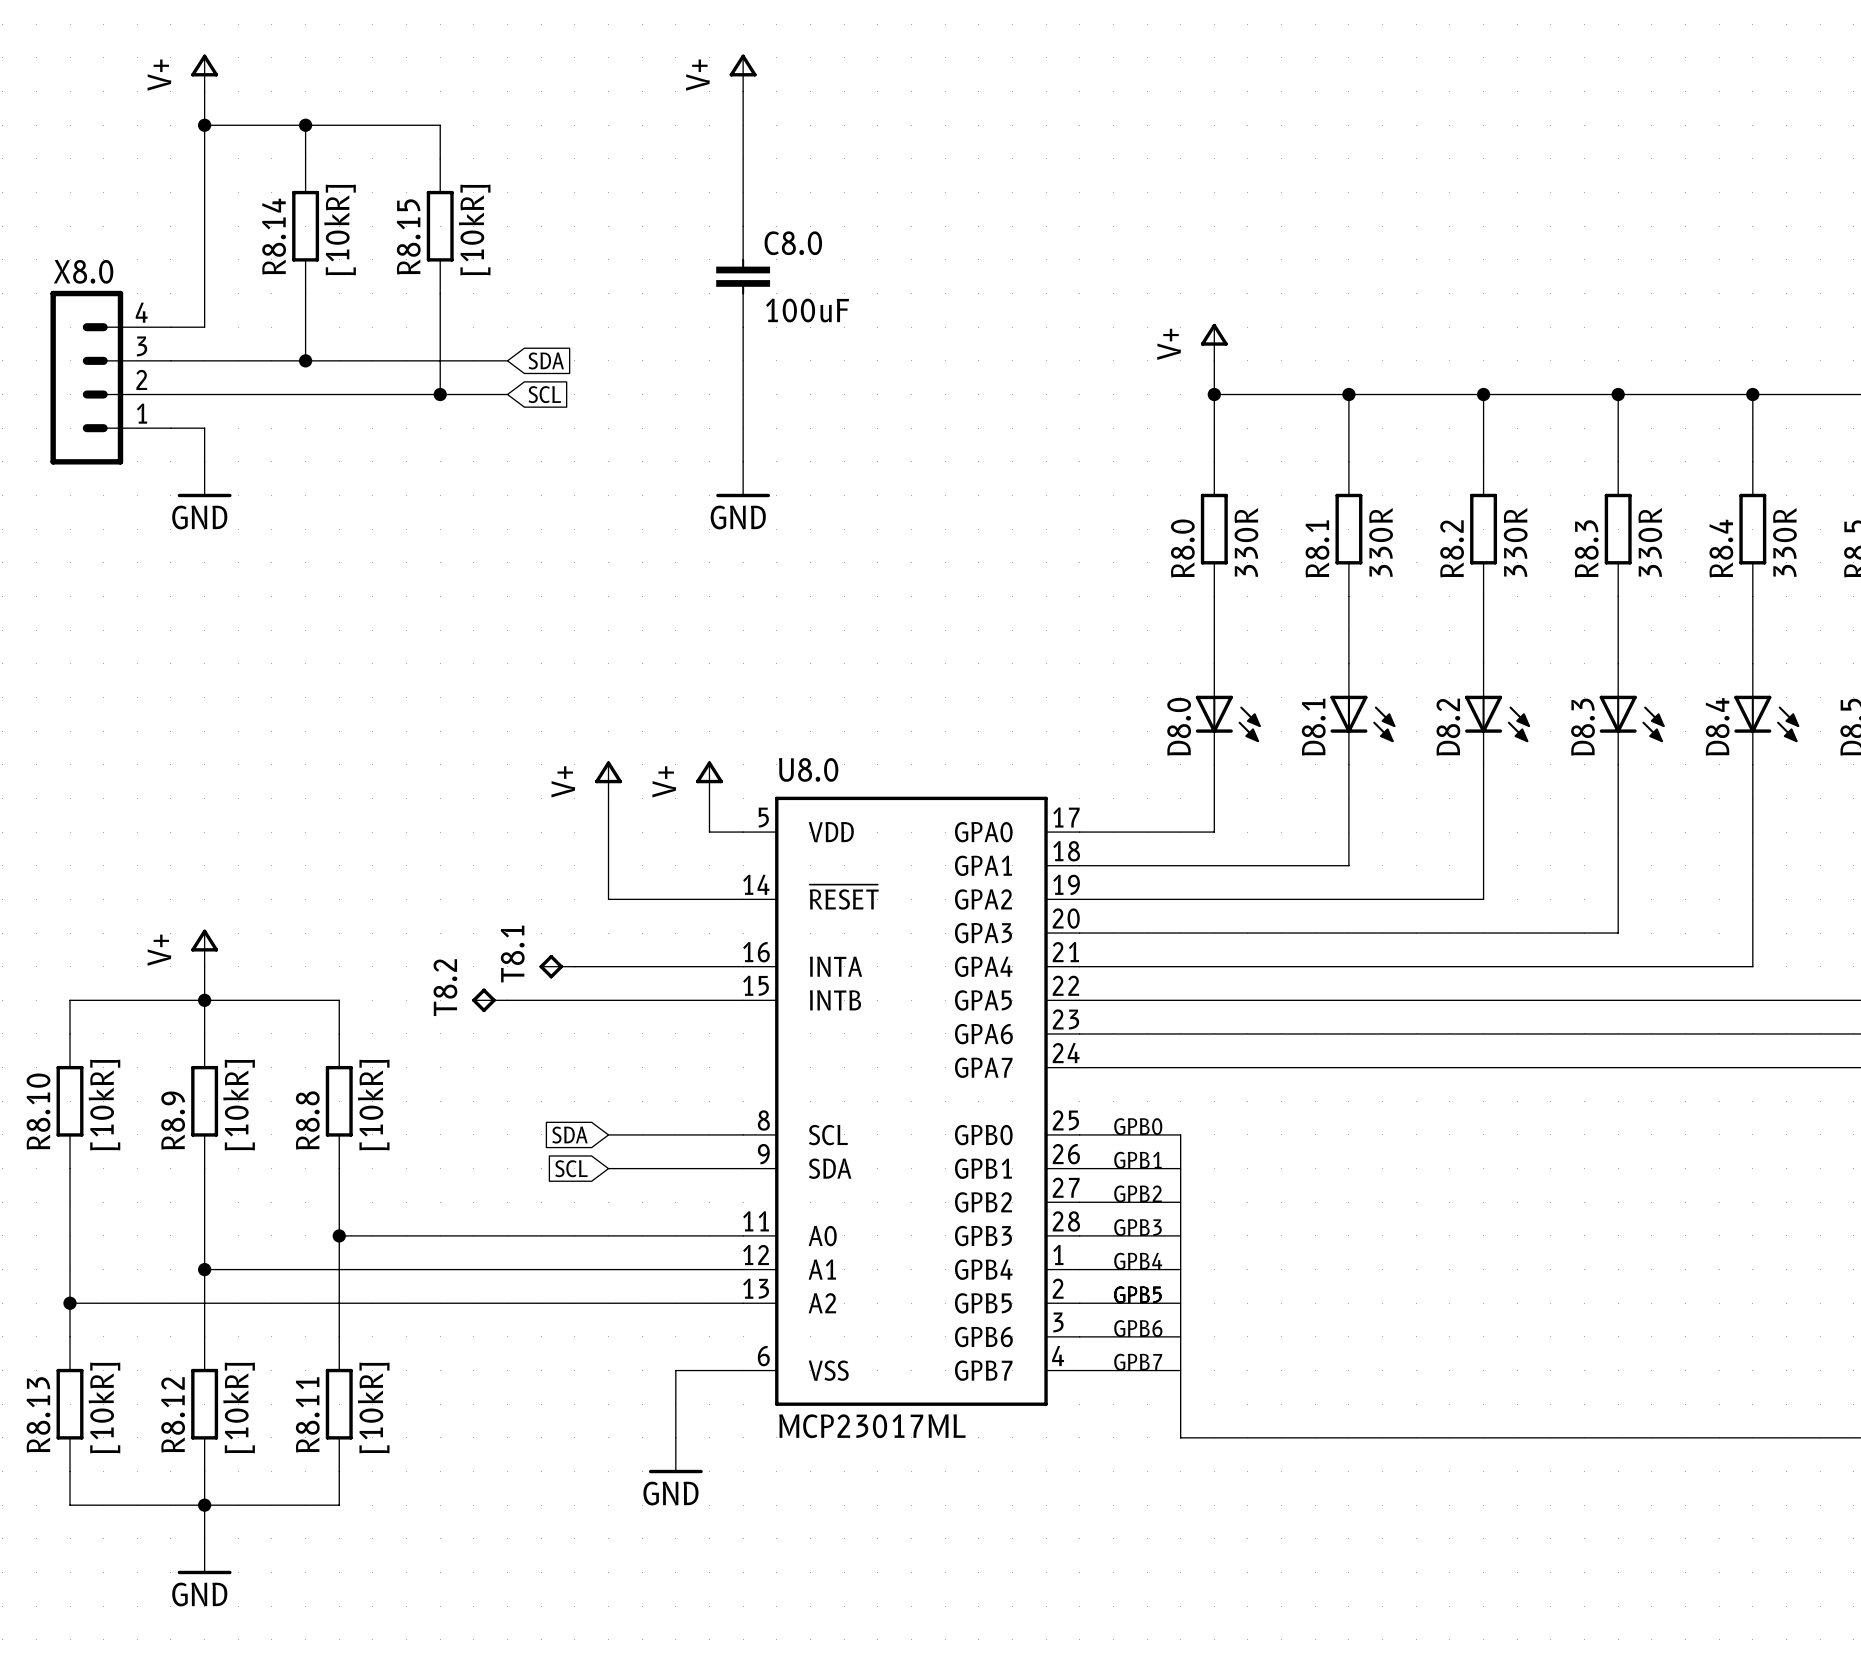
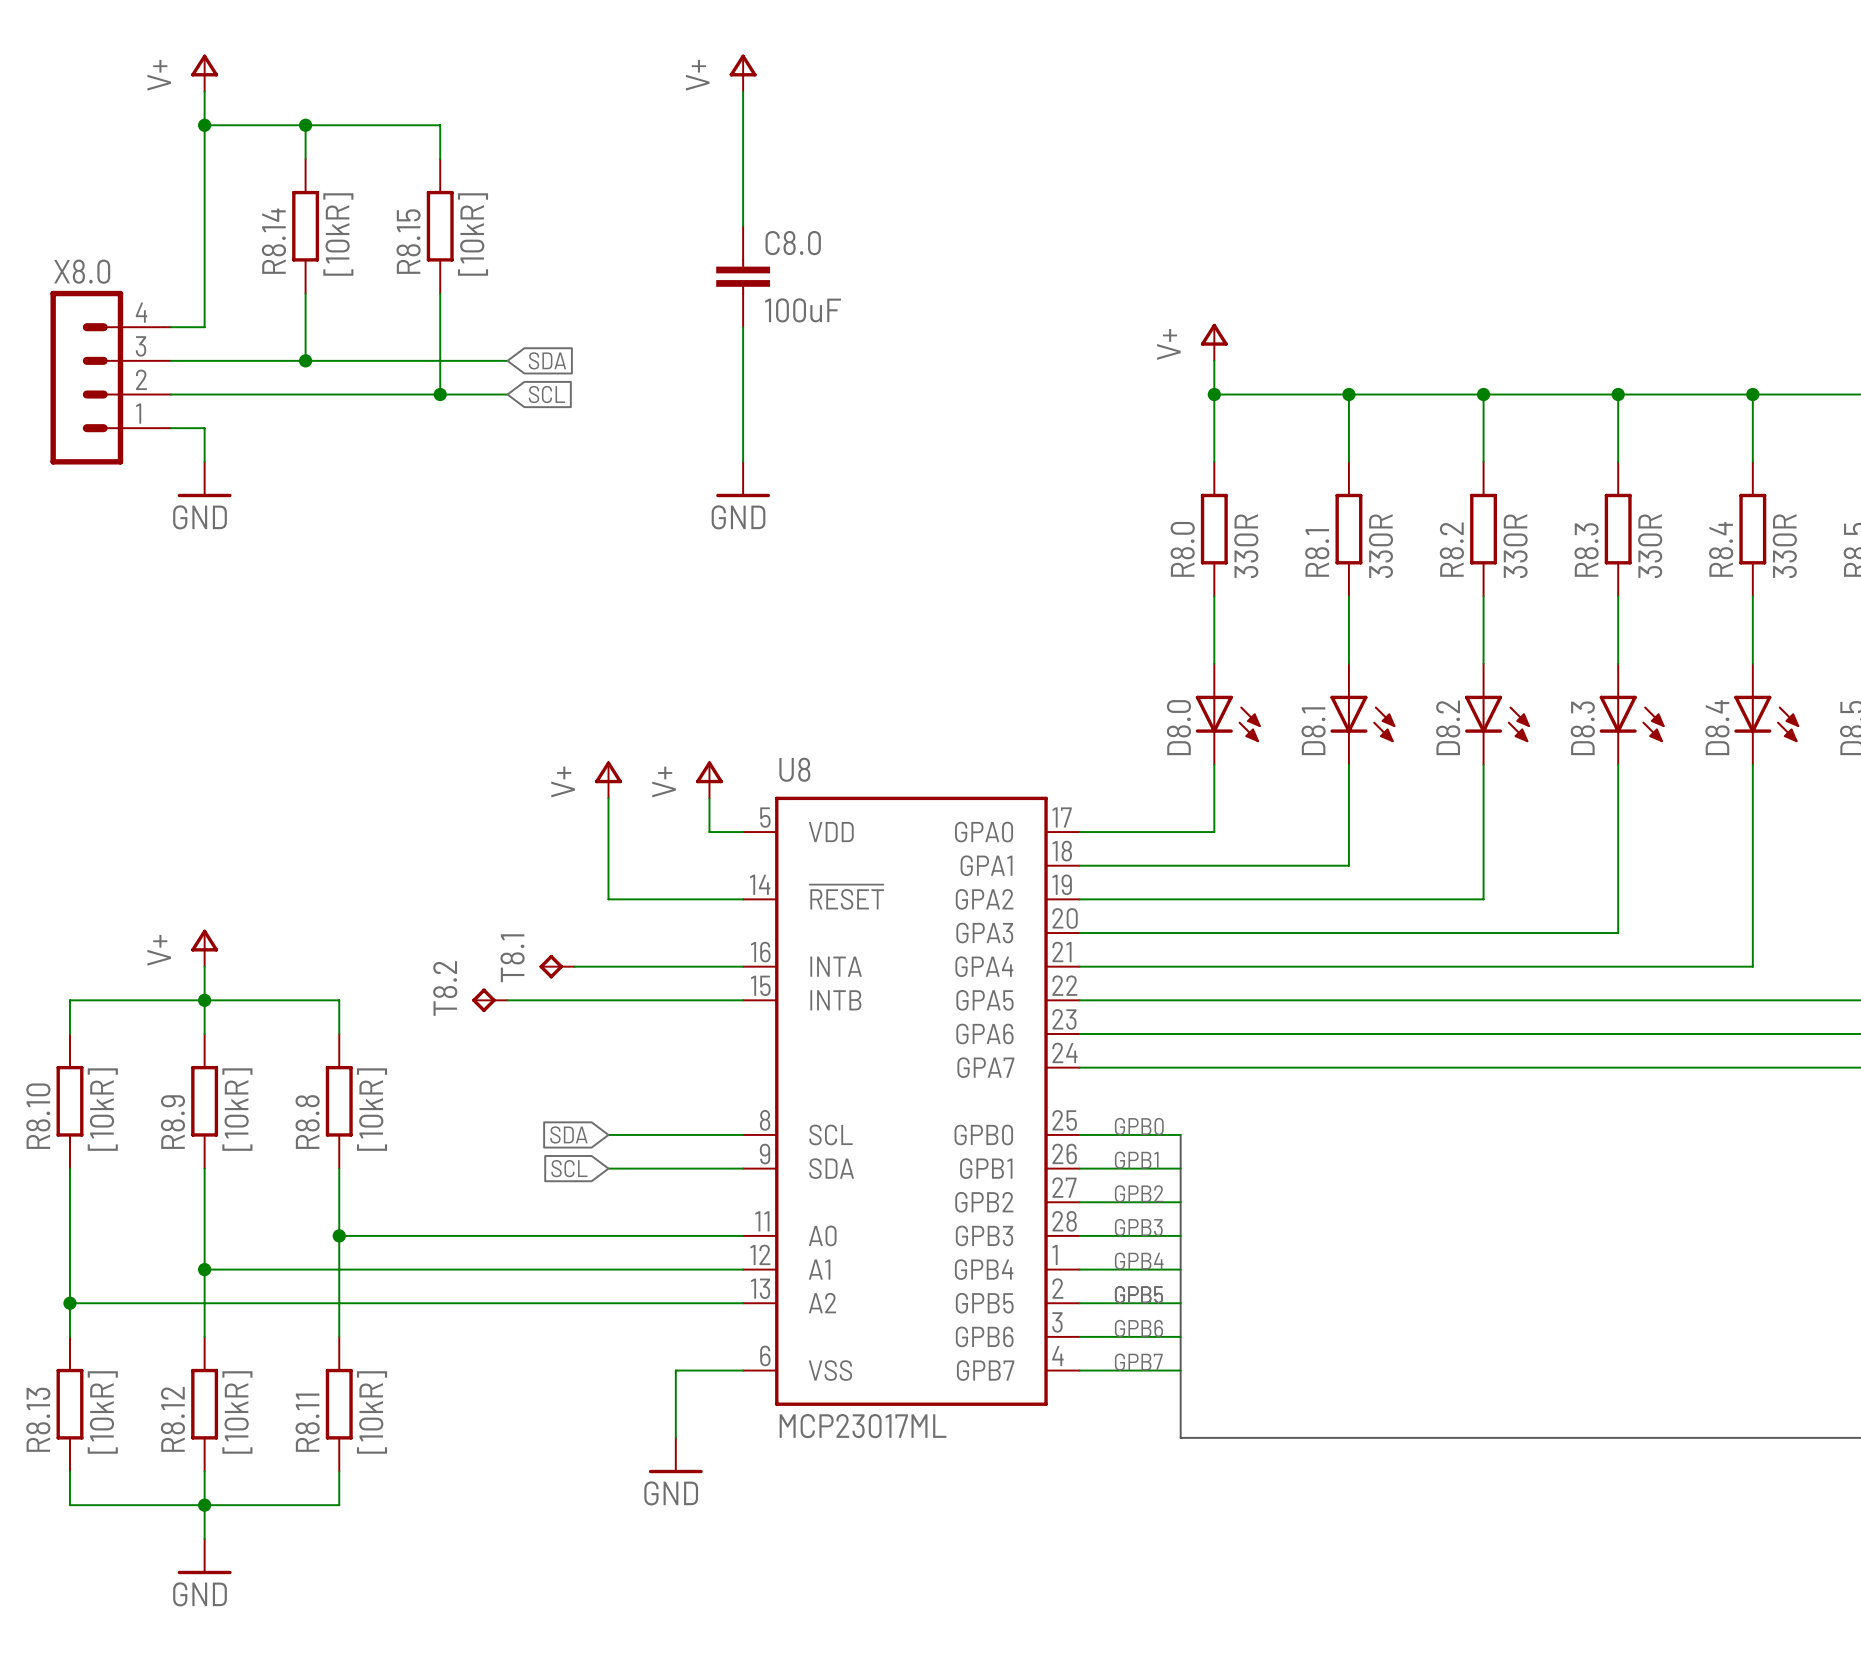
U8.0 name: U8.0 (808, 769) -> U8 (794, 769)

